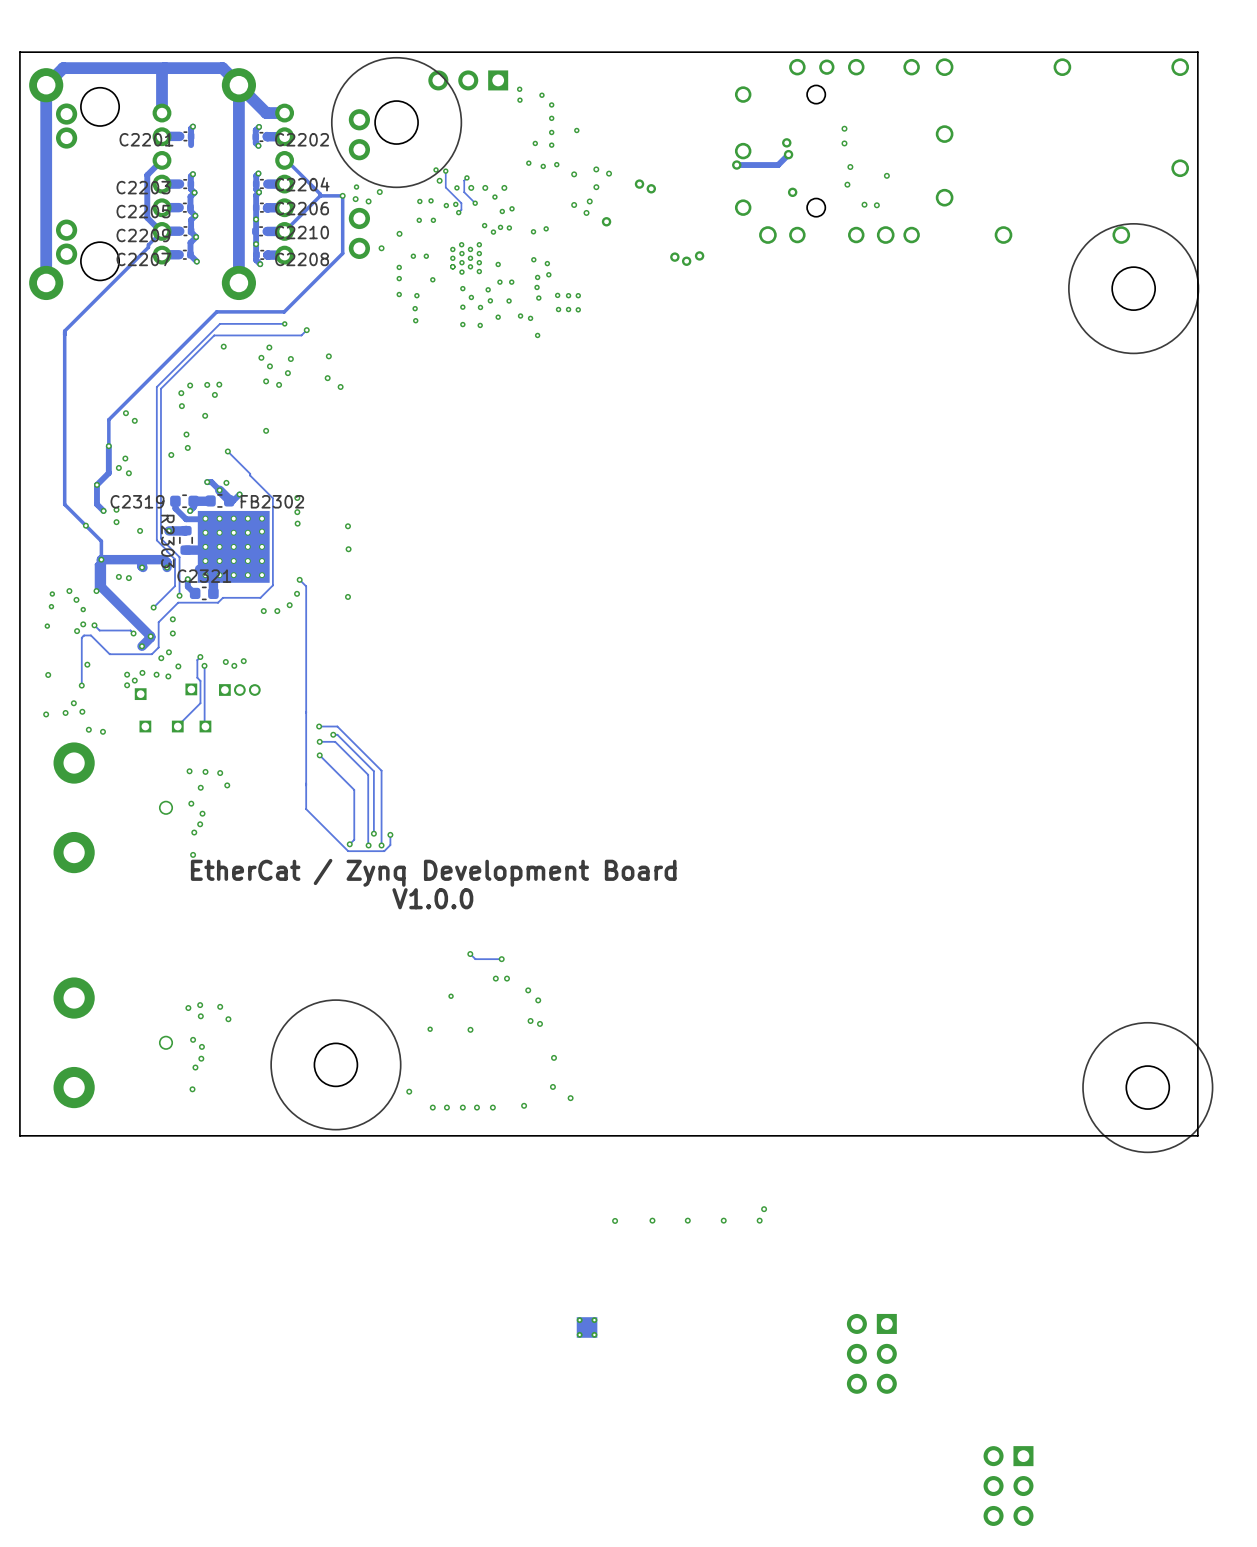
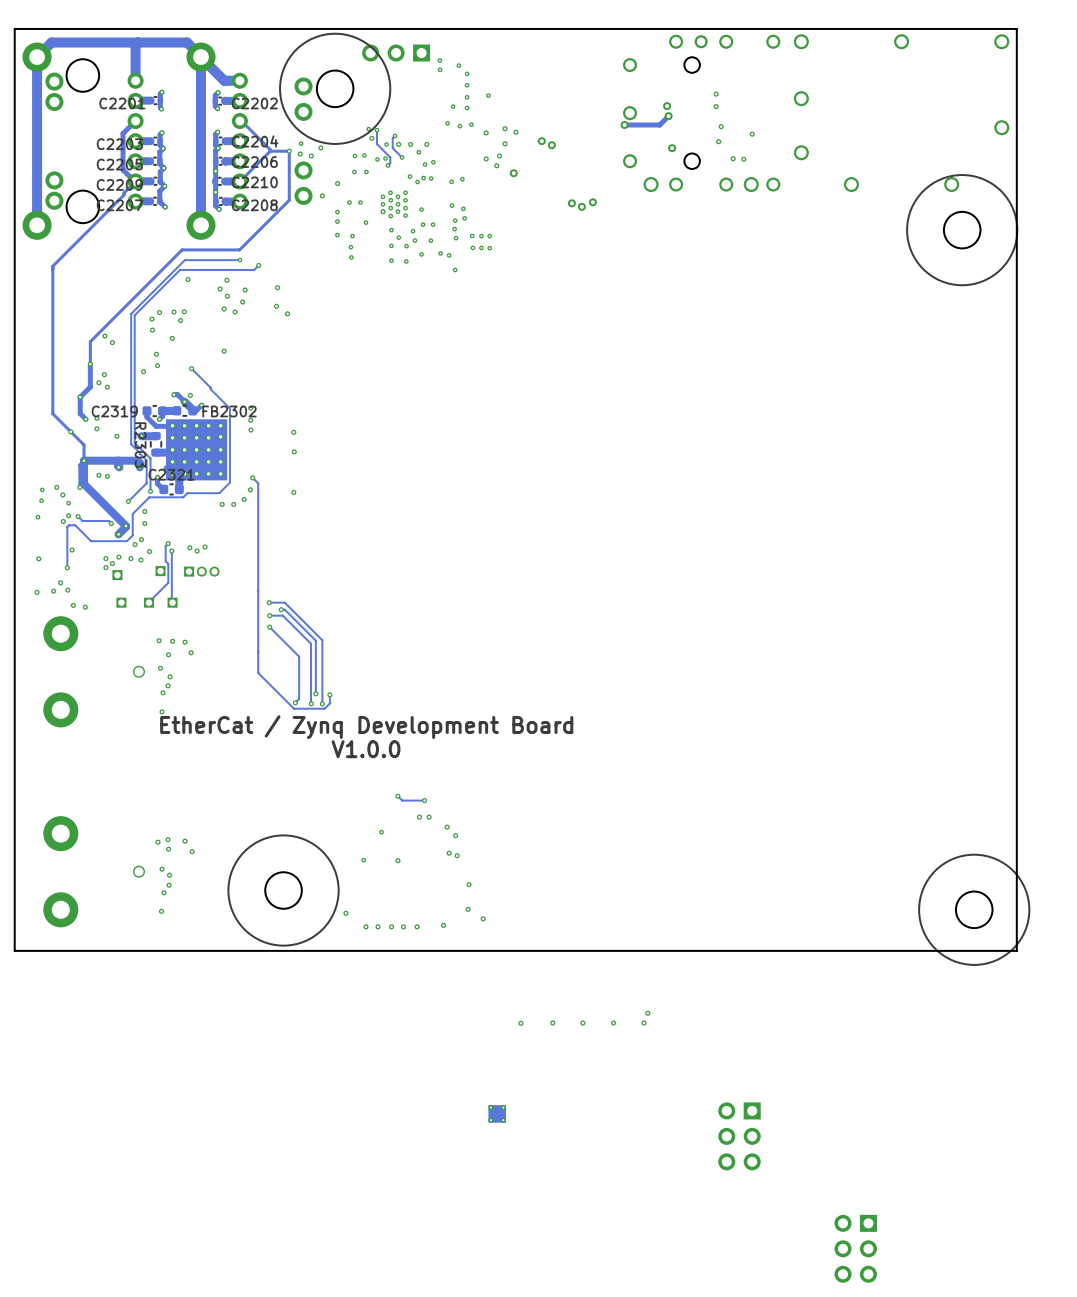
via: none -> (161, 109)

